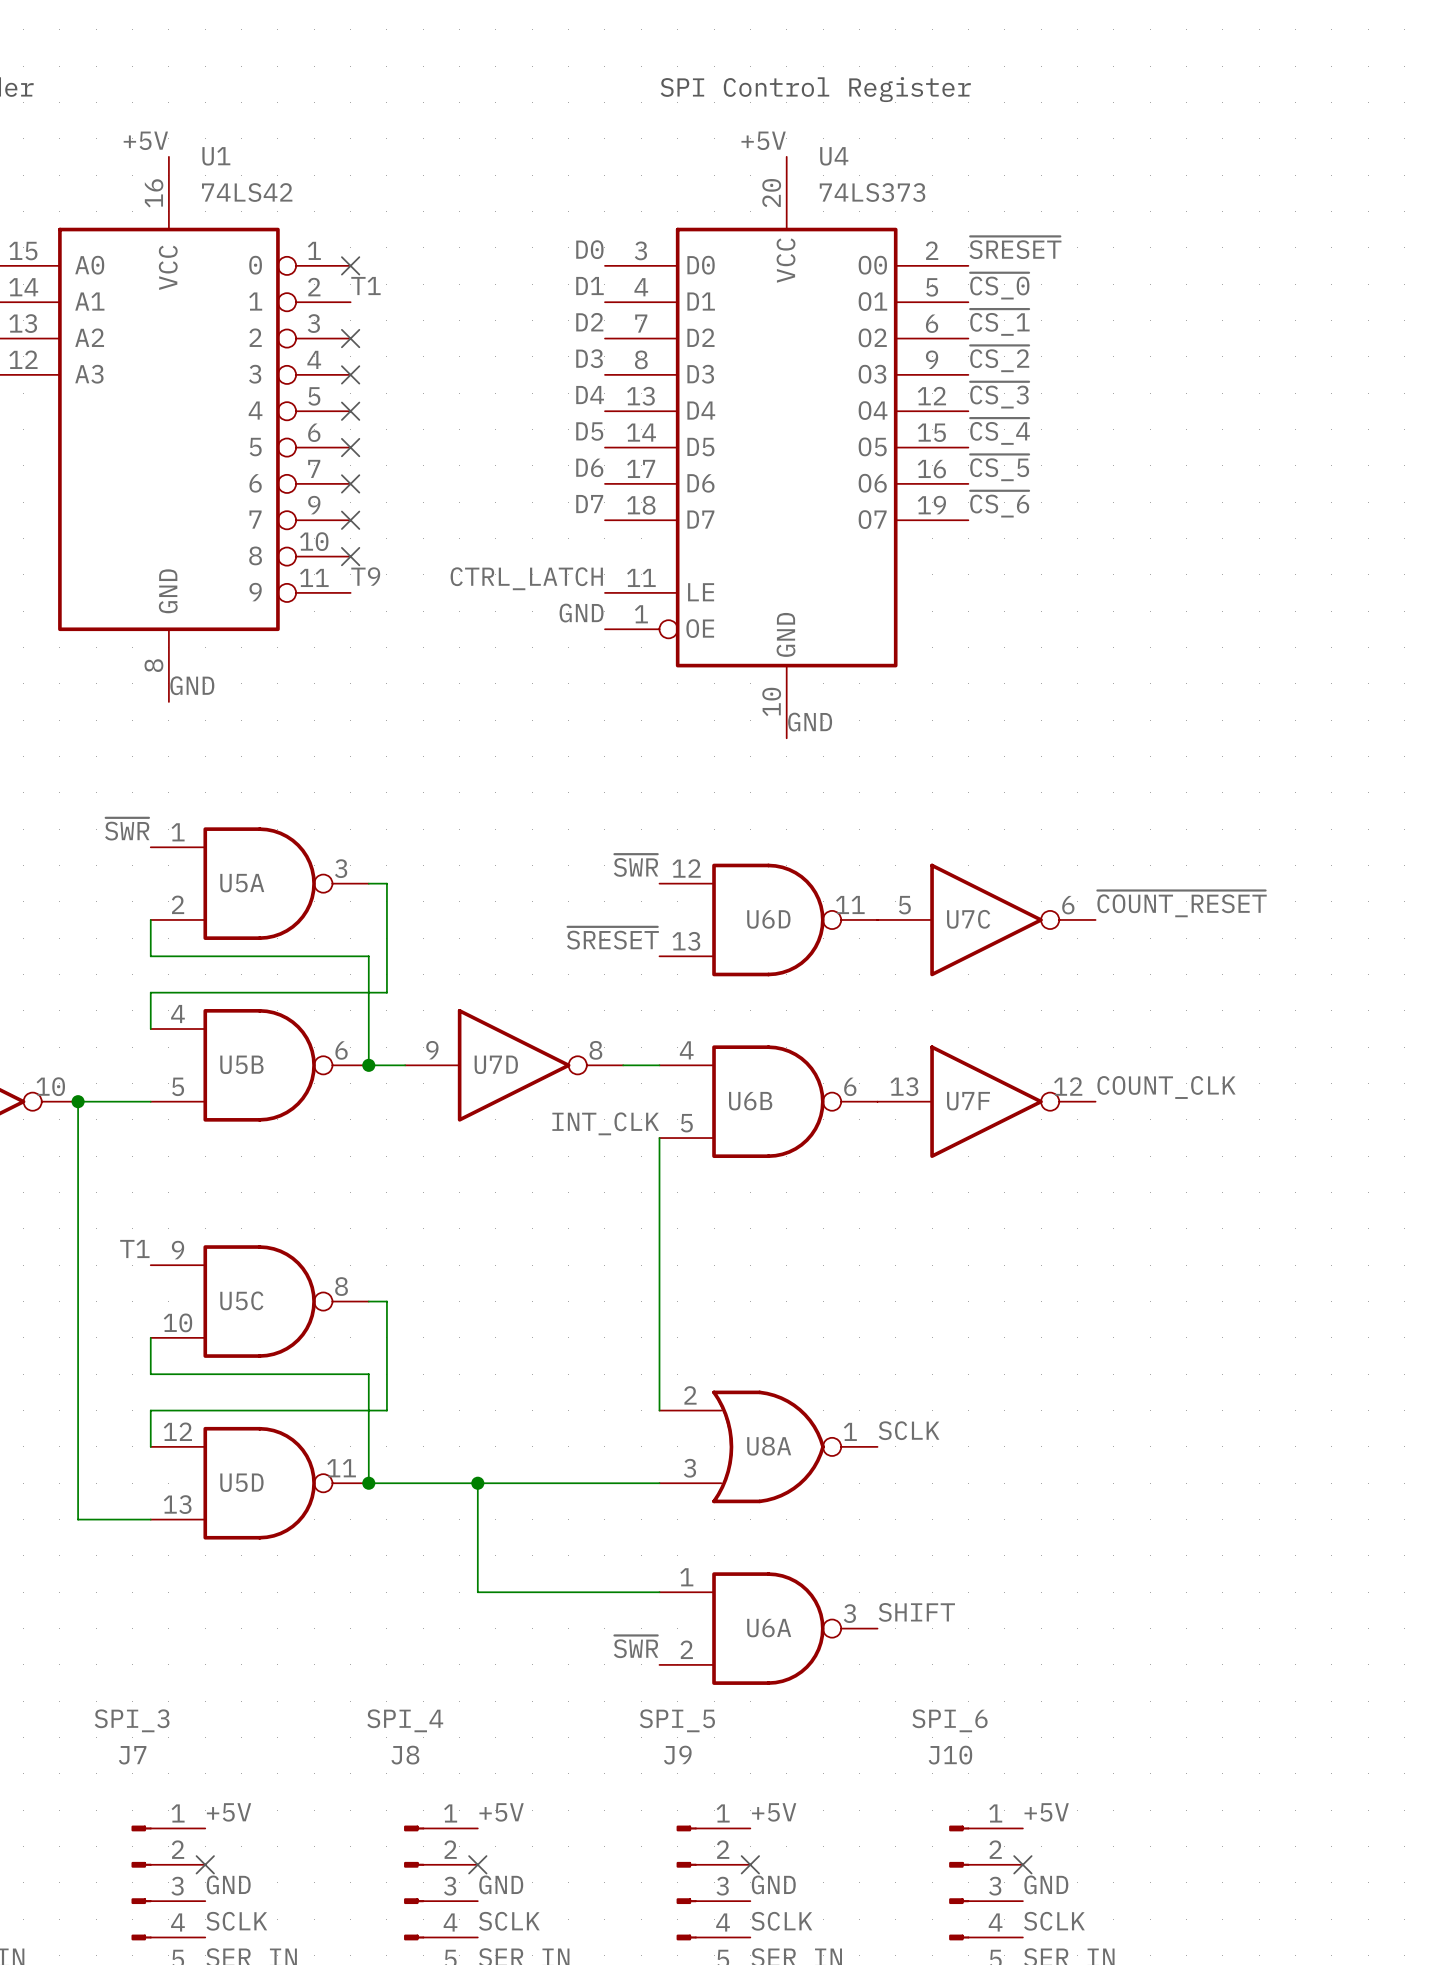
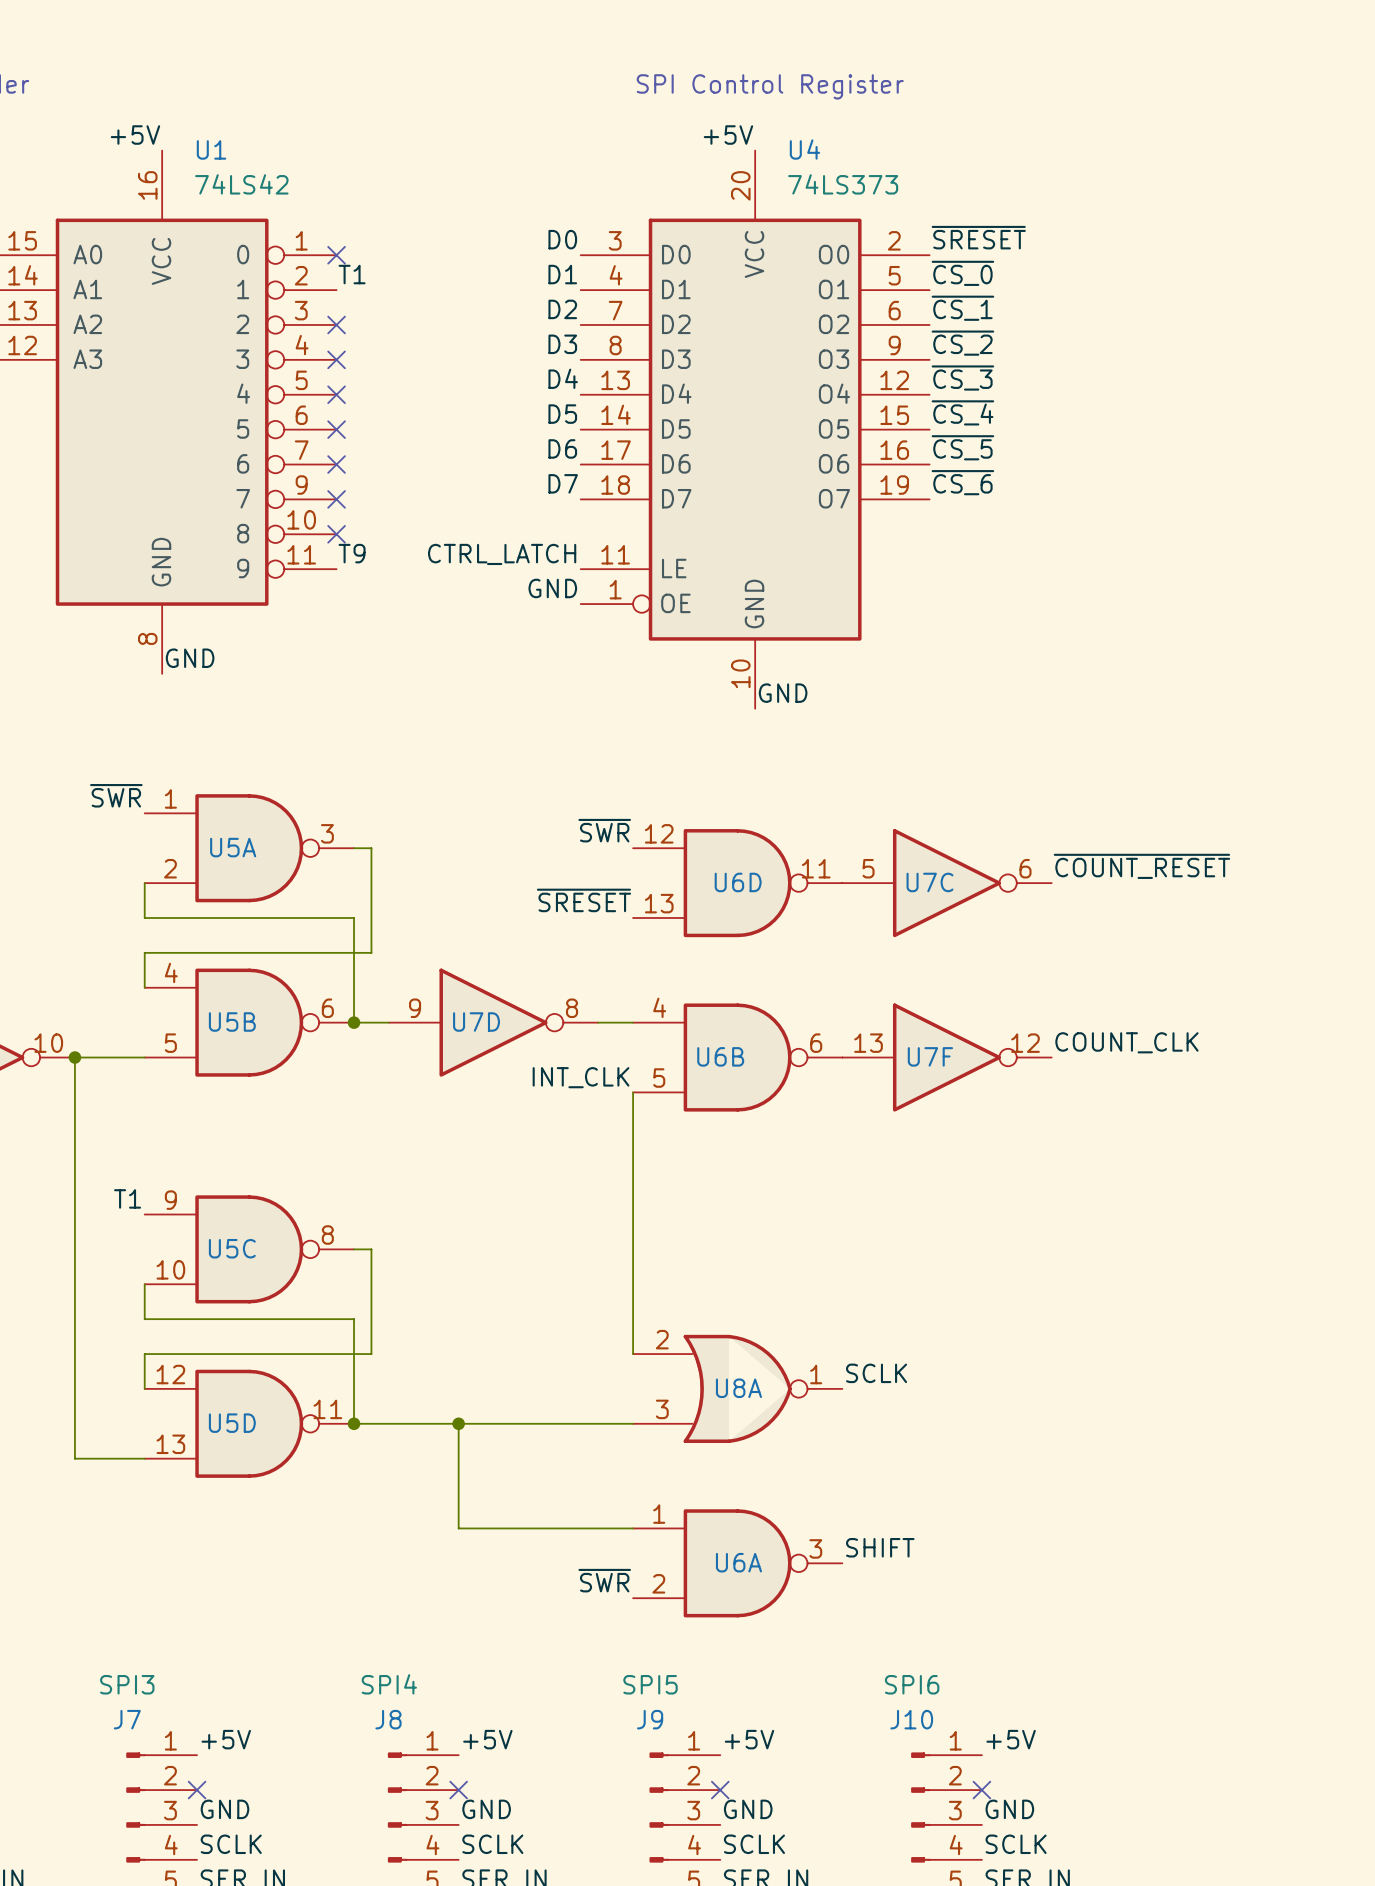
J7 value: SPI_3 (132, 1720) -> SPI3 (127, 1684)
J8 value: SPI_4 (405, 1720) -> SPI4 (389, 1684)
J9 value: SPI_5 (677, 1720) -> SPI5 (650, 1684)
J10 value: SPI_6 (949, 1720) -> SPI6 (912, 1684)
J7 name position: J7 (132, 1755) -> J7 (127, 1719)
J8 name position: J8 (405, 1755) -> J8 (388, 1719)
J9 name position: J9 (677, 1755) -> J9 (650, 1719)
J10 name position: J10 (950, 1755) -> J10 (911, 1719)

